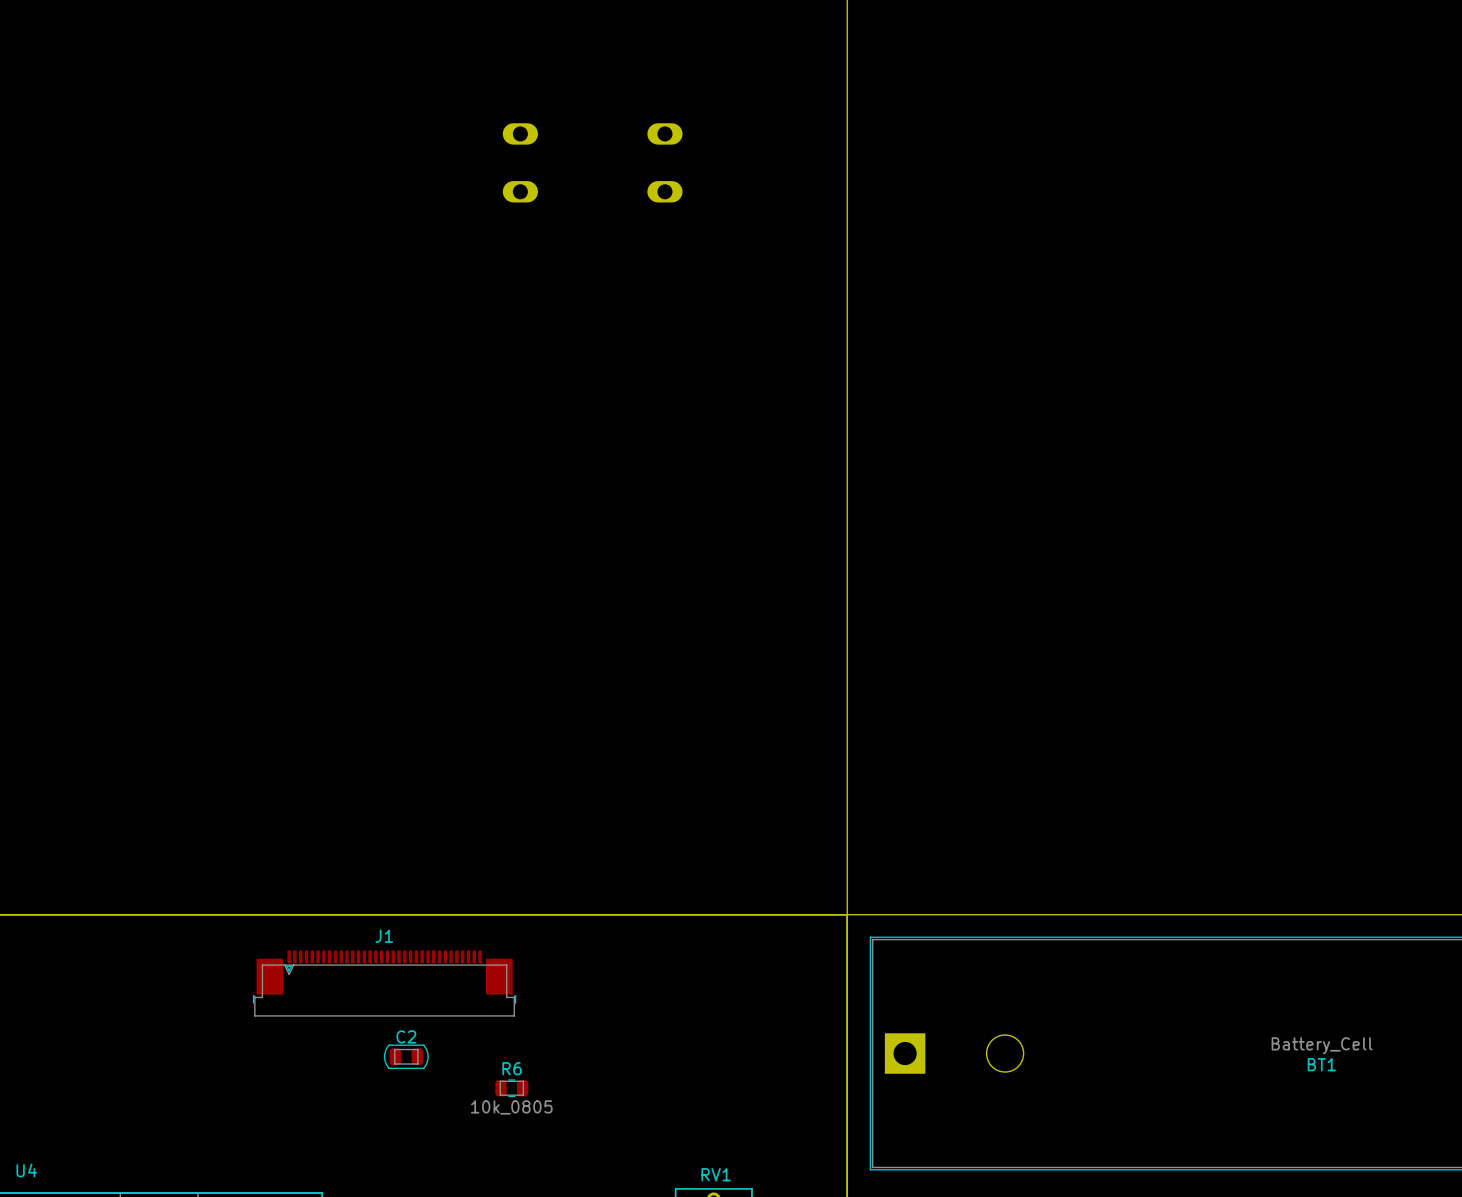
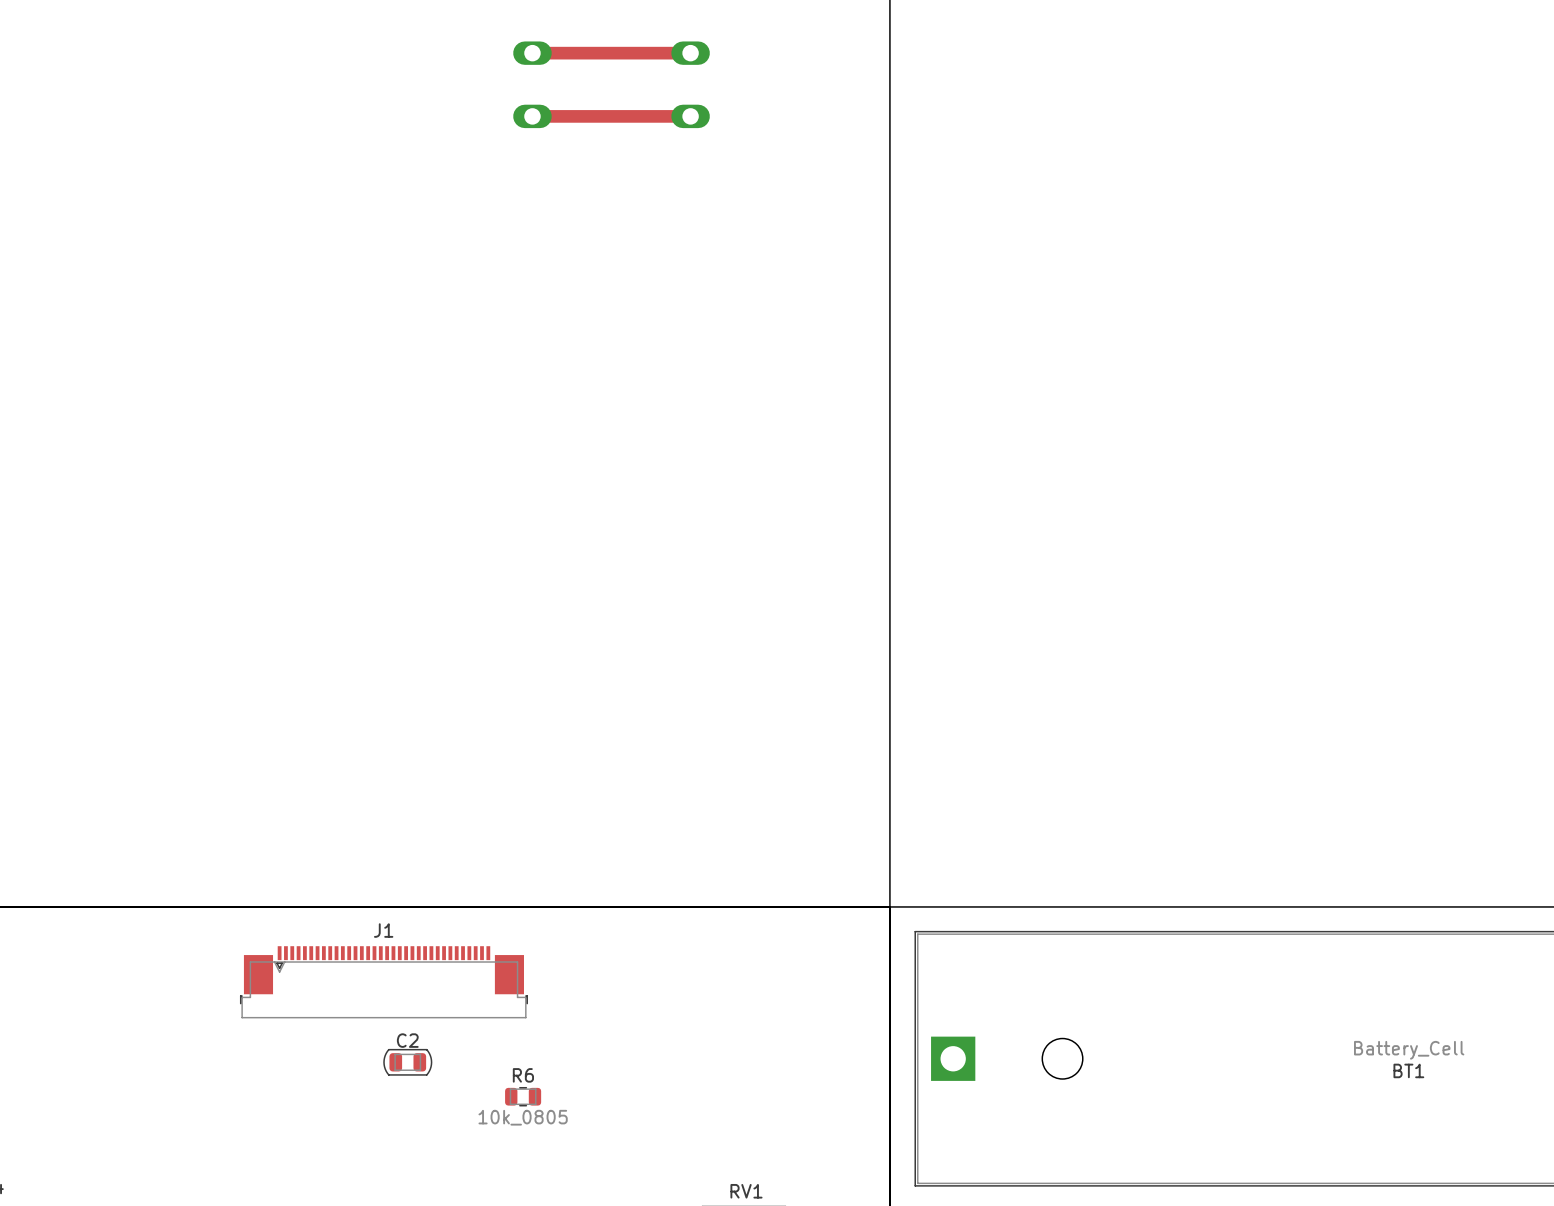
track: none -> (532, 53) (690, 53)
track: none -> (532, 116) (690, 116)

